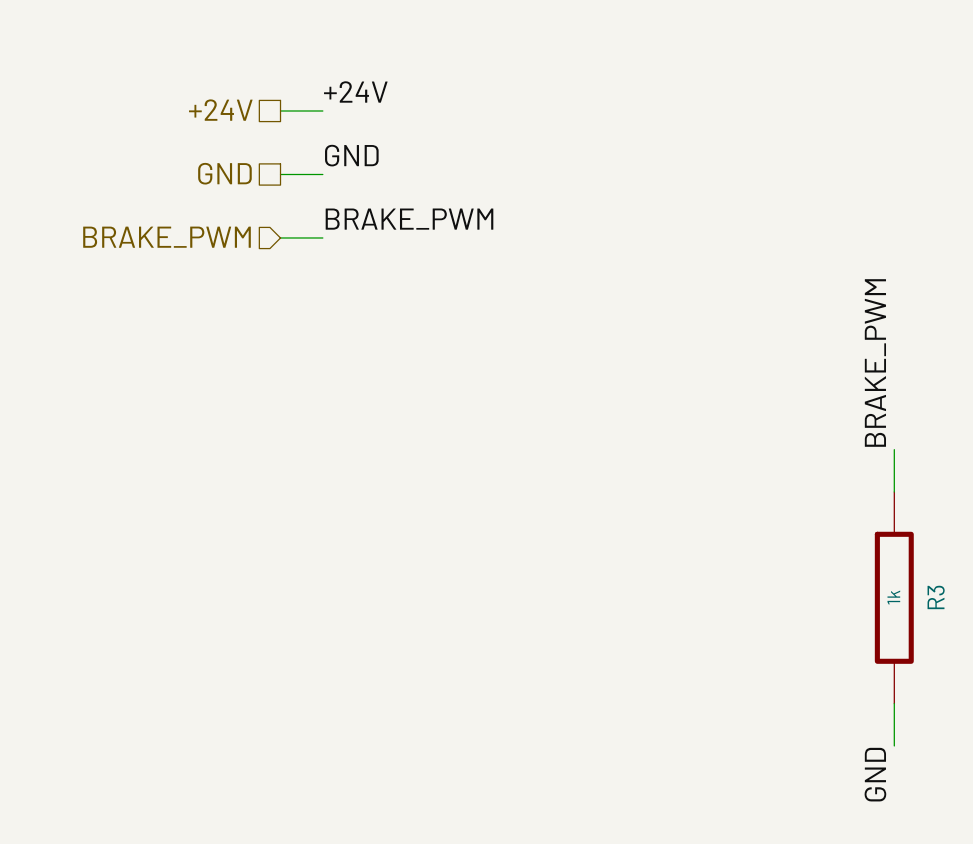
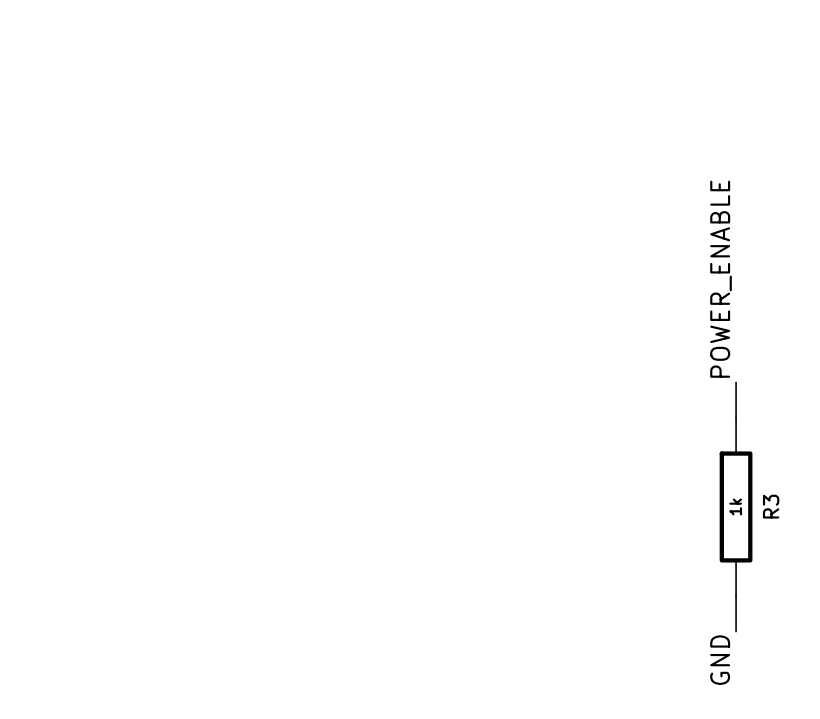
label: +24V (355, 91) -> none
hierarchical label: +24V (220, 110) -> none
wire: (280, 111) (322, 111) -> none
label: GND (351, 155) -> none
hierarchical label: GND (224, 173) -> none
wire: (280, 174) (322, 174) -> none
label: BRAKE_PWM (409, 219) -> none
hierarchical label: BRAKE_PWM (167, 237) -> none
wire: (280, 237) (322, 237) -> none
label: BRAKE_PWM (875, 362) -> POWER_ENABLE (721, 279)

